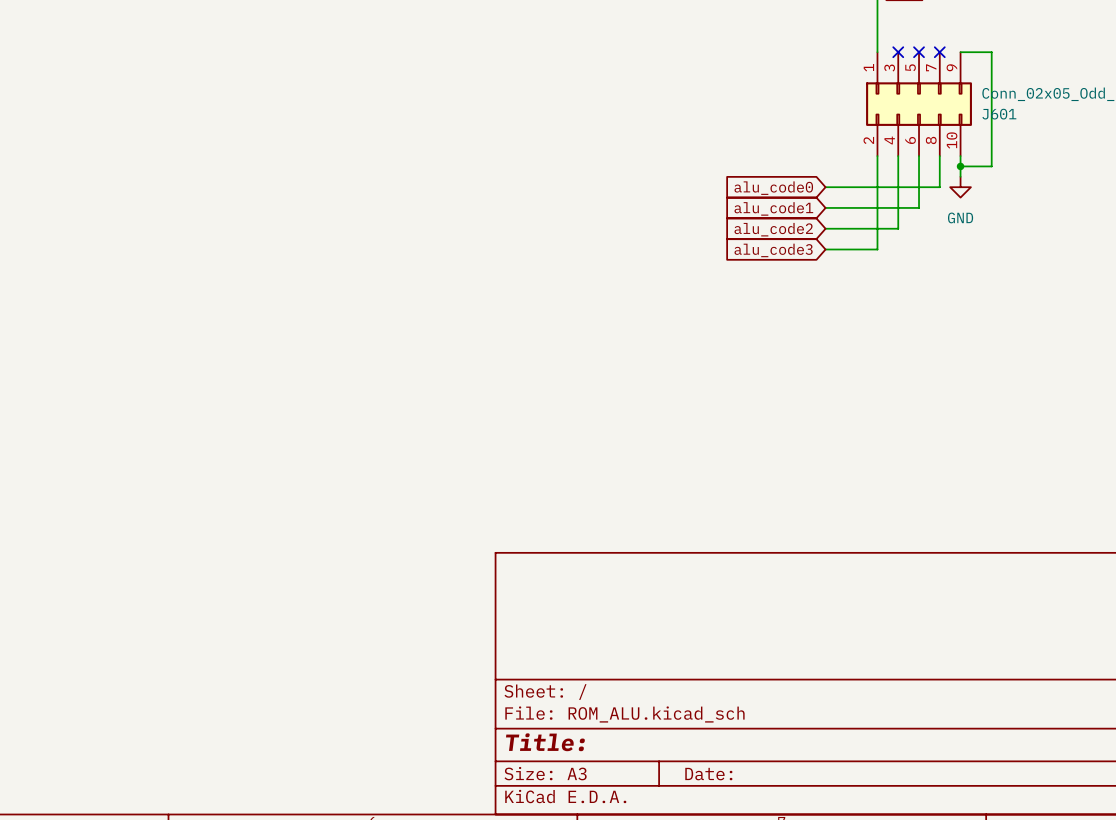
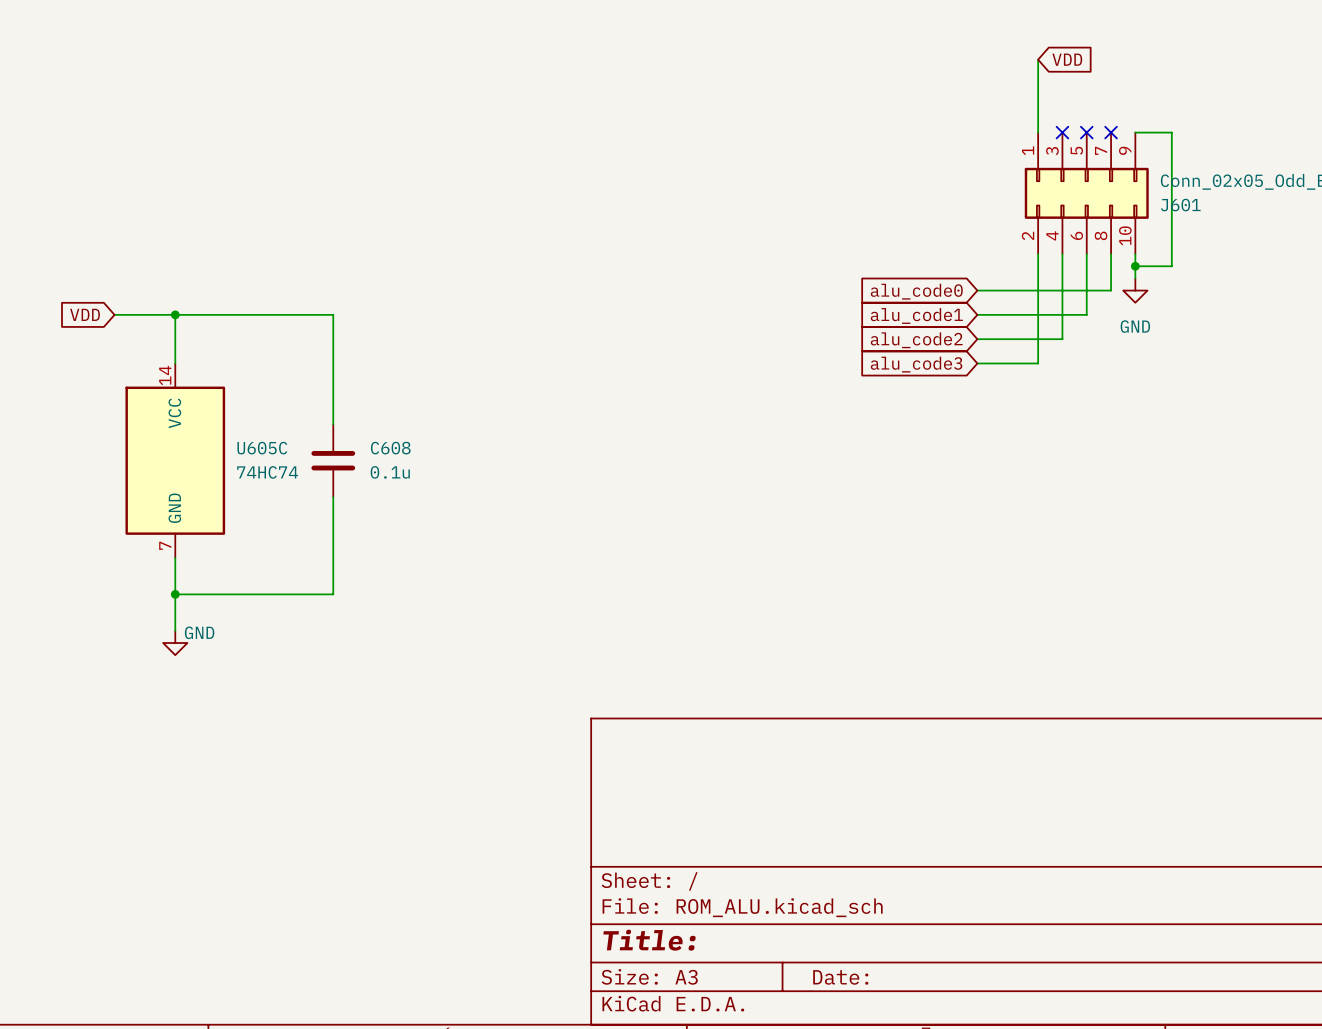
global label: none -> VDD (85, 314)
wire: none -> (114, 314) (333, 314) (333, 424)
wire: none -> (175, 314) (175, 363)
junction: none -> (175, 314)
U605C: none -> 74HC74 (175, 460)
C608: none -> 0.1u (333, 460)
wire: none -> (333, 497) (333, 594) (175, 594)
wire: none -> (175, 557) (175, 630)
junction: none -> (175, 594)
power symbol: none -> GND (175, 643)

